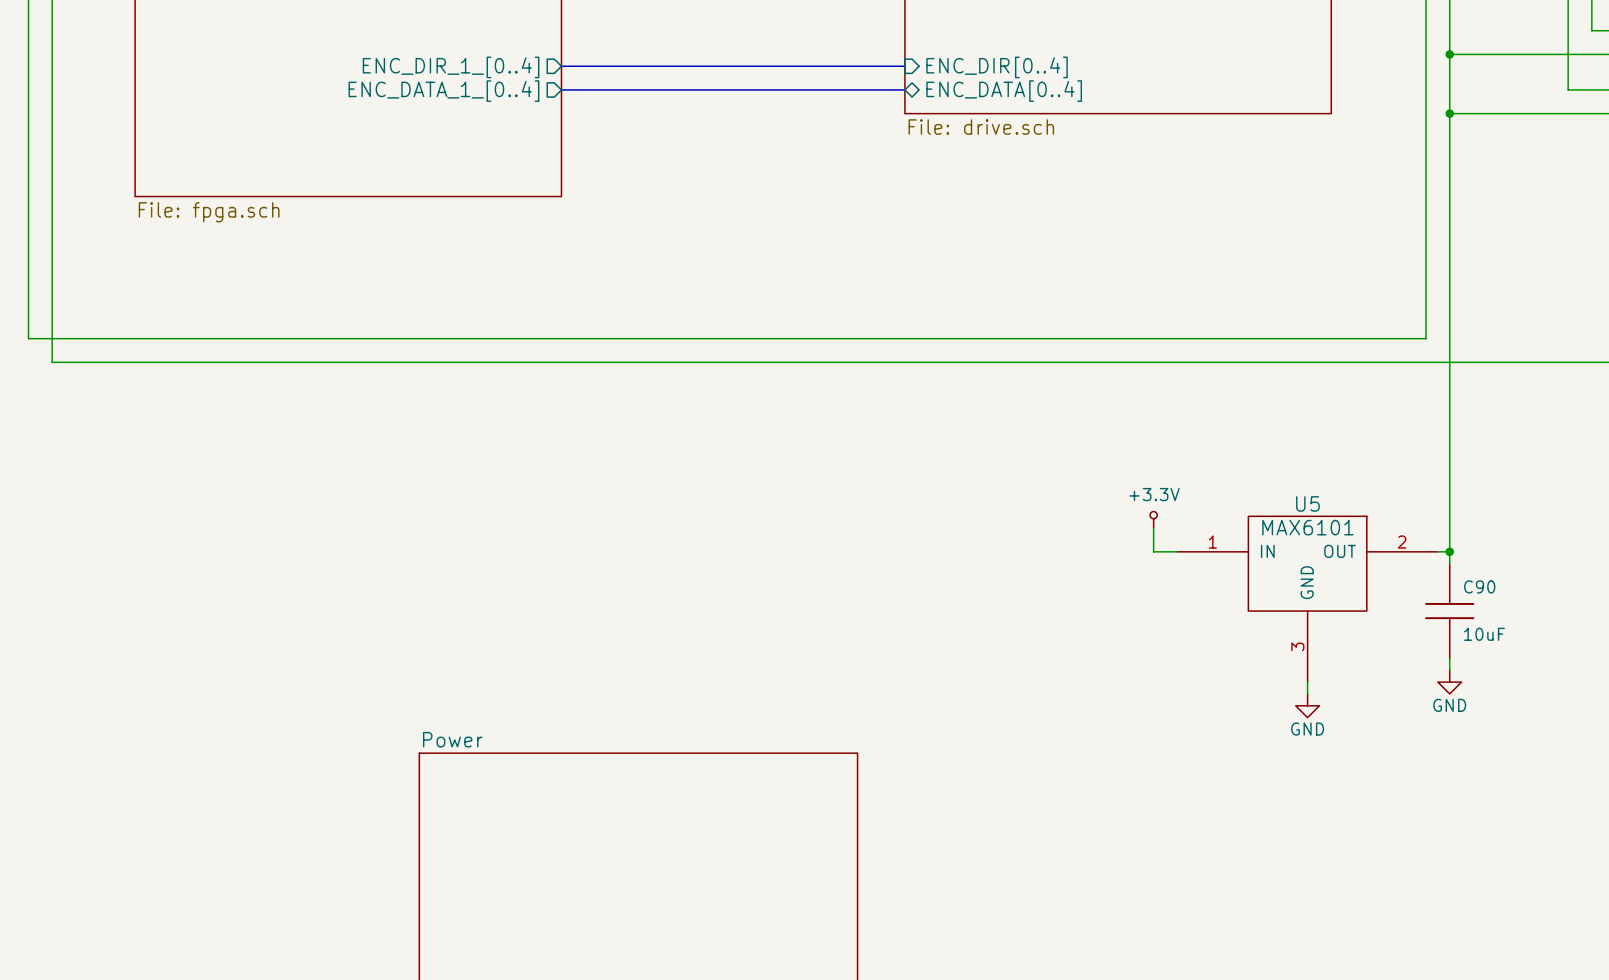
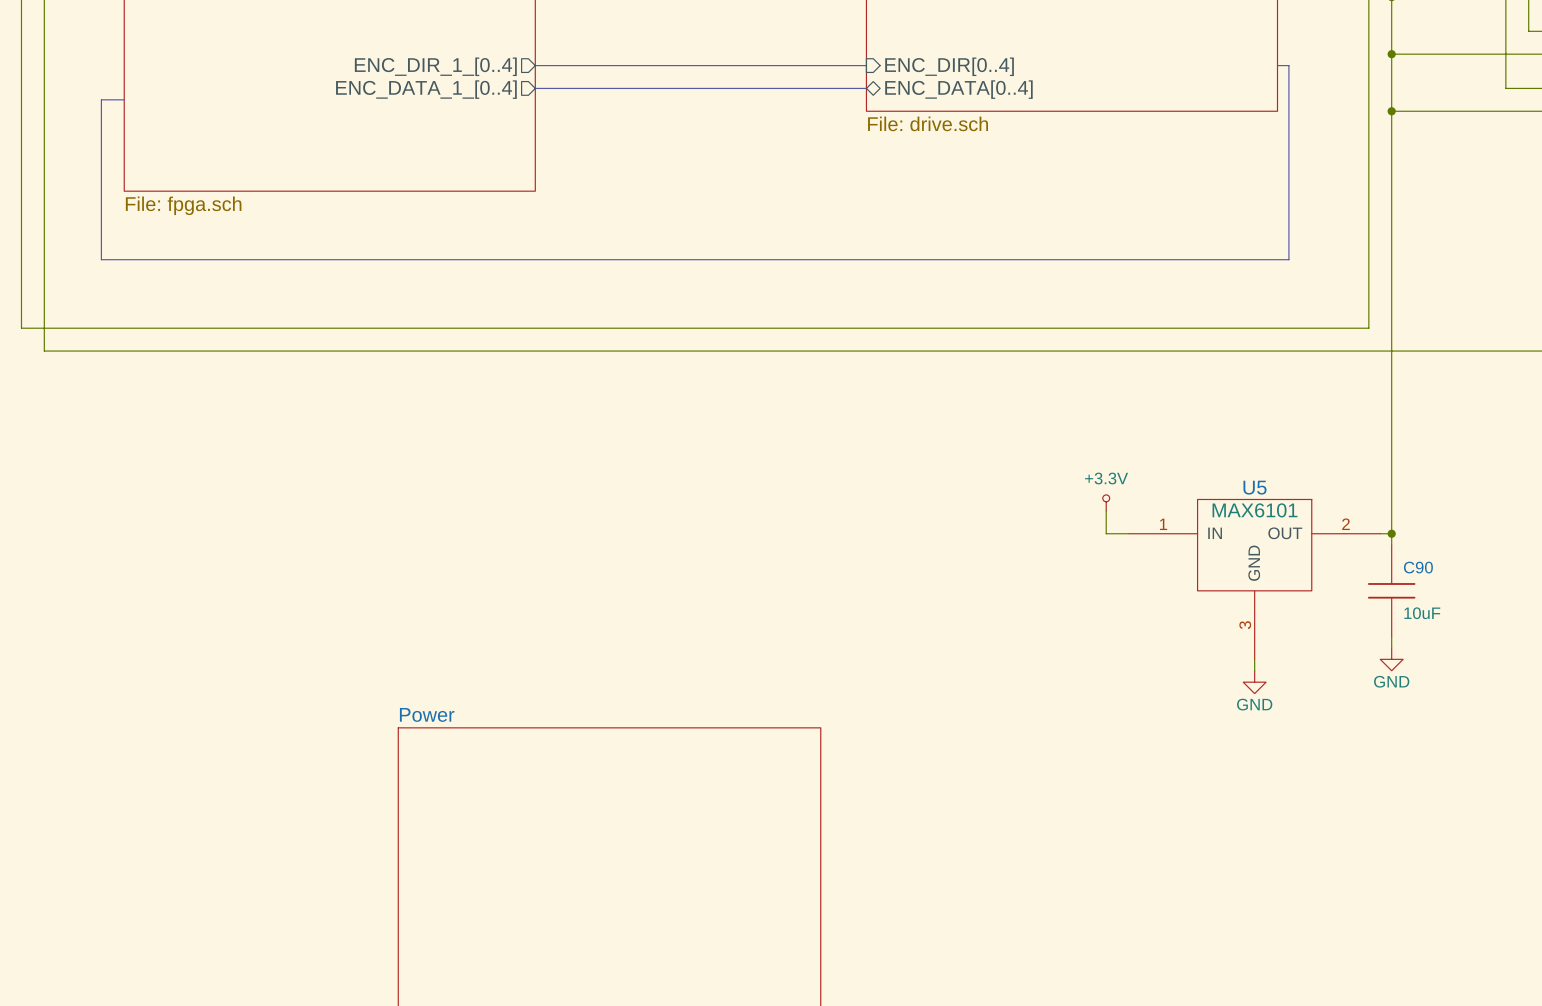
bus: none -> (1277, 65) (1288, 65) (1288, 259) (101, 259) (101, 99) (124, 99)

